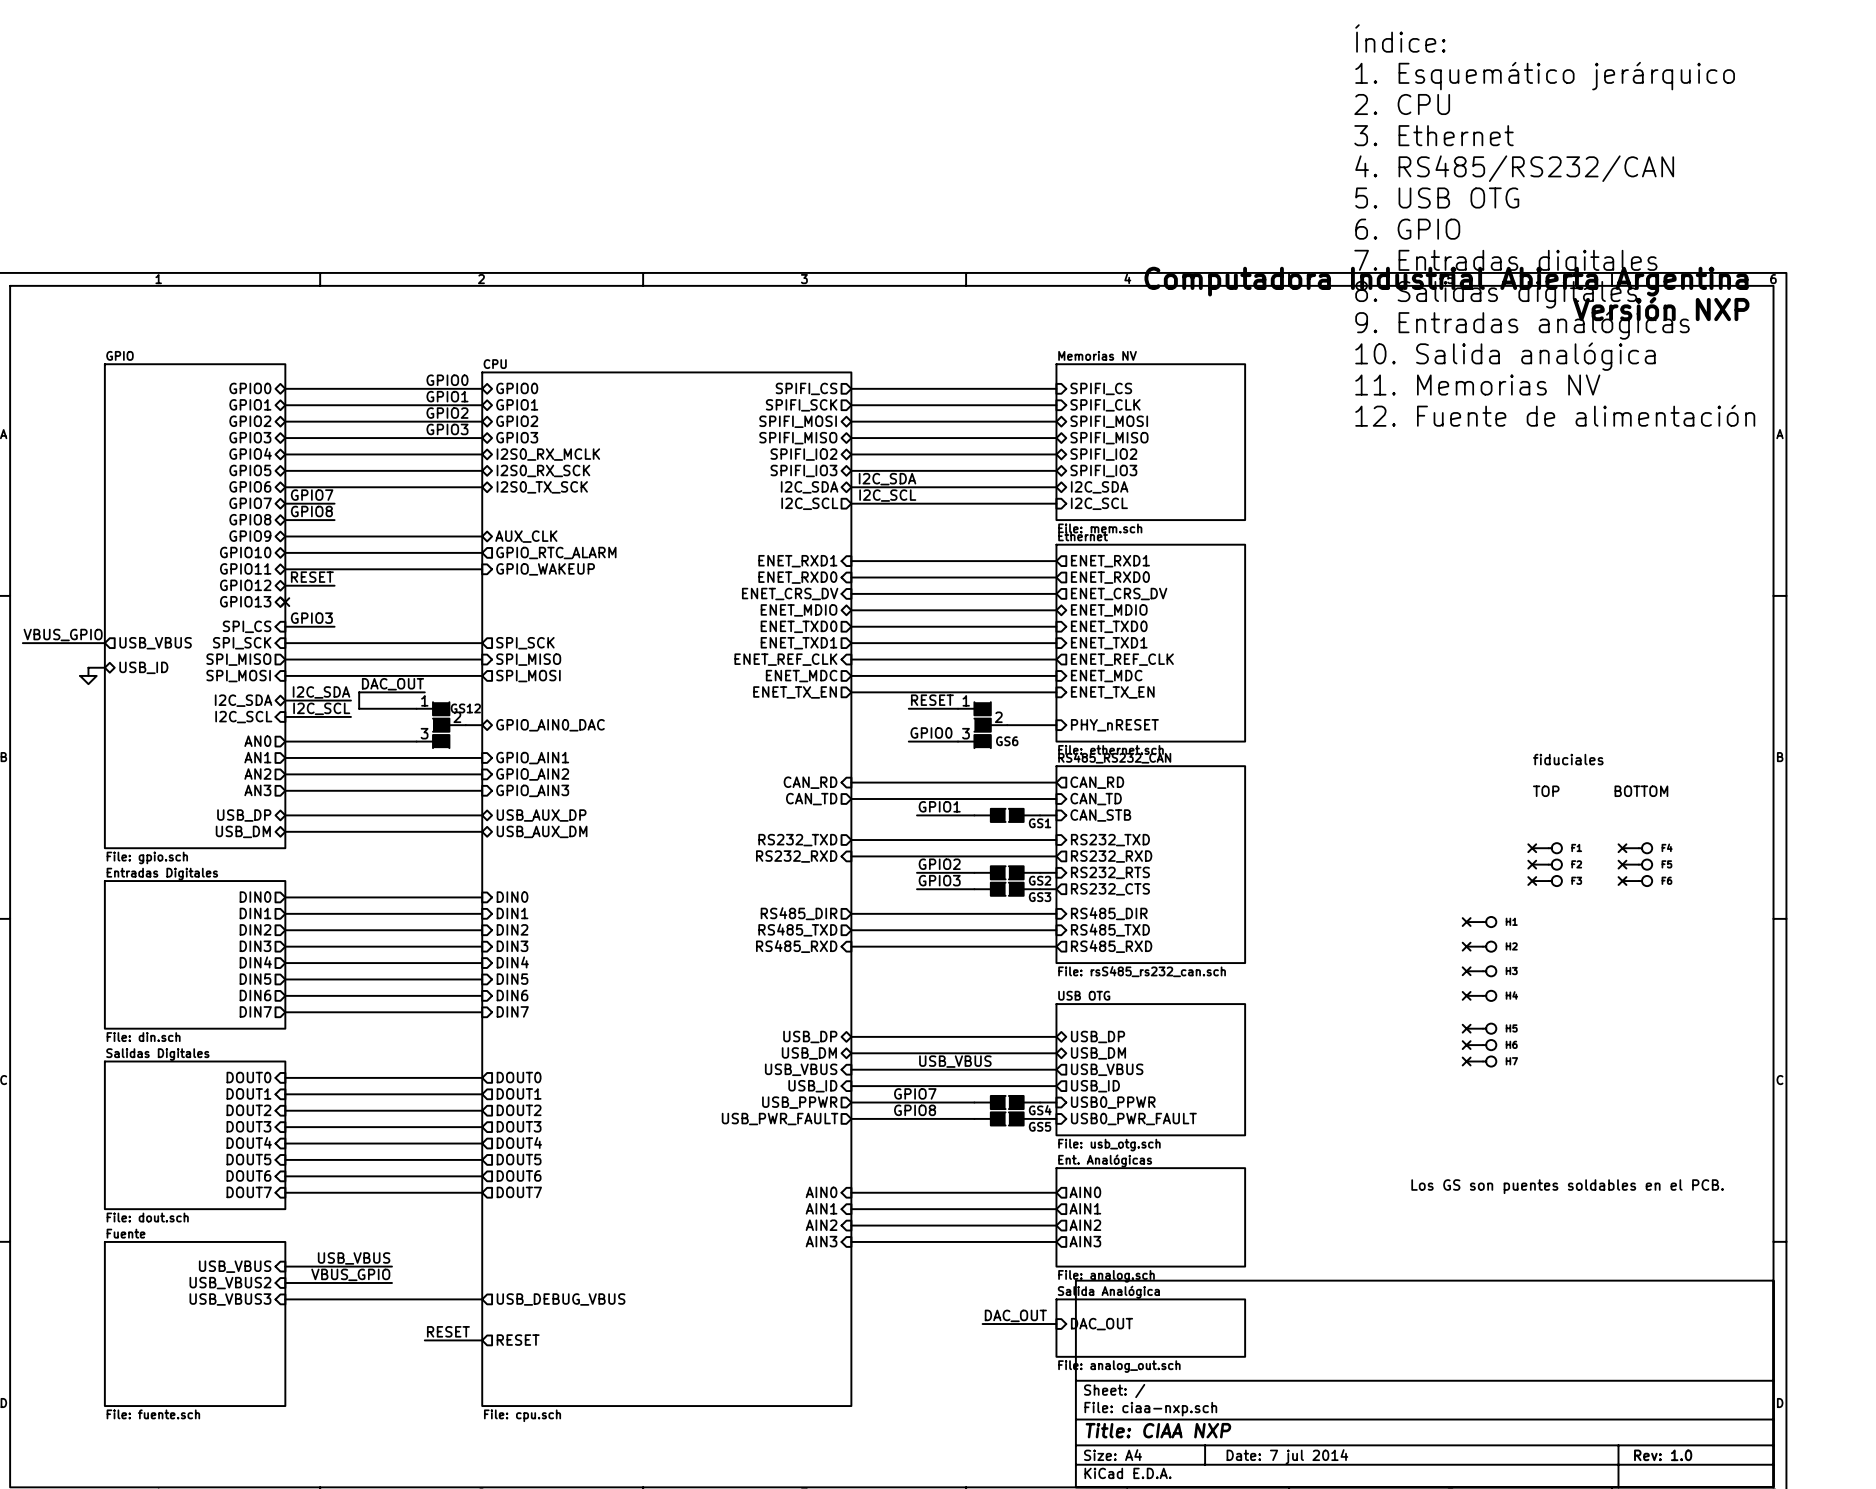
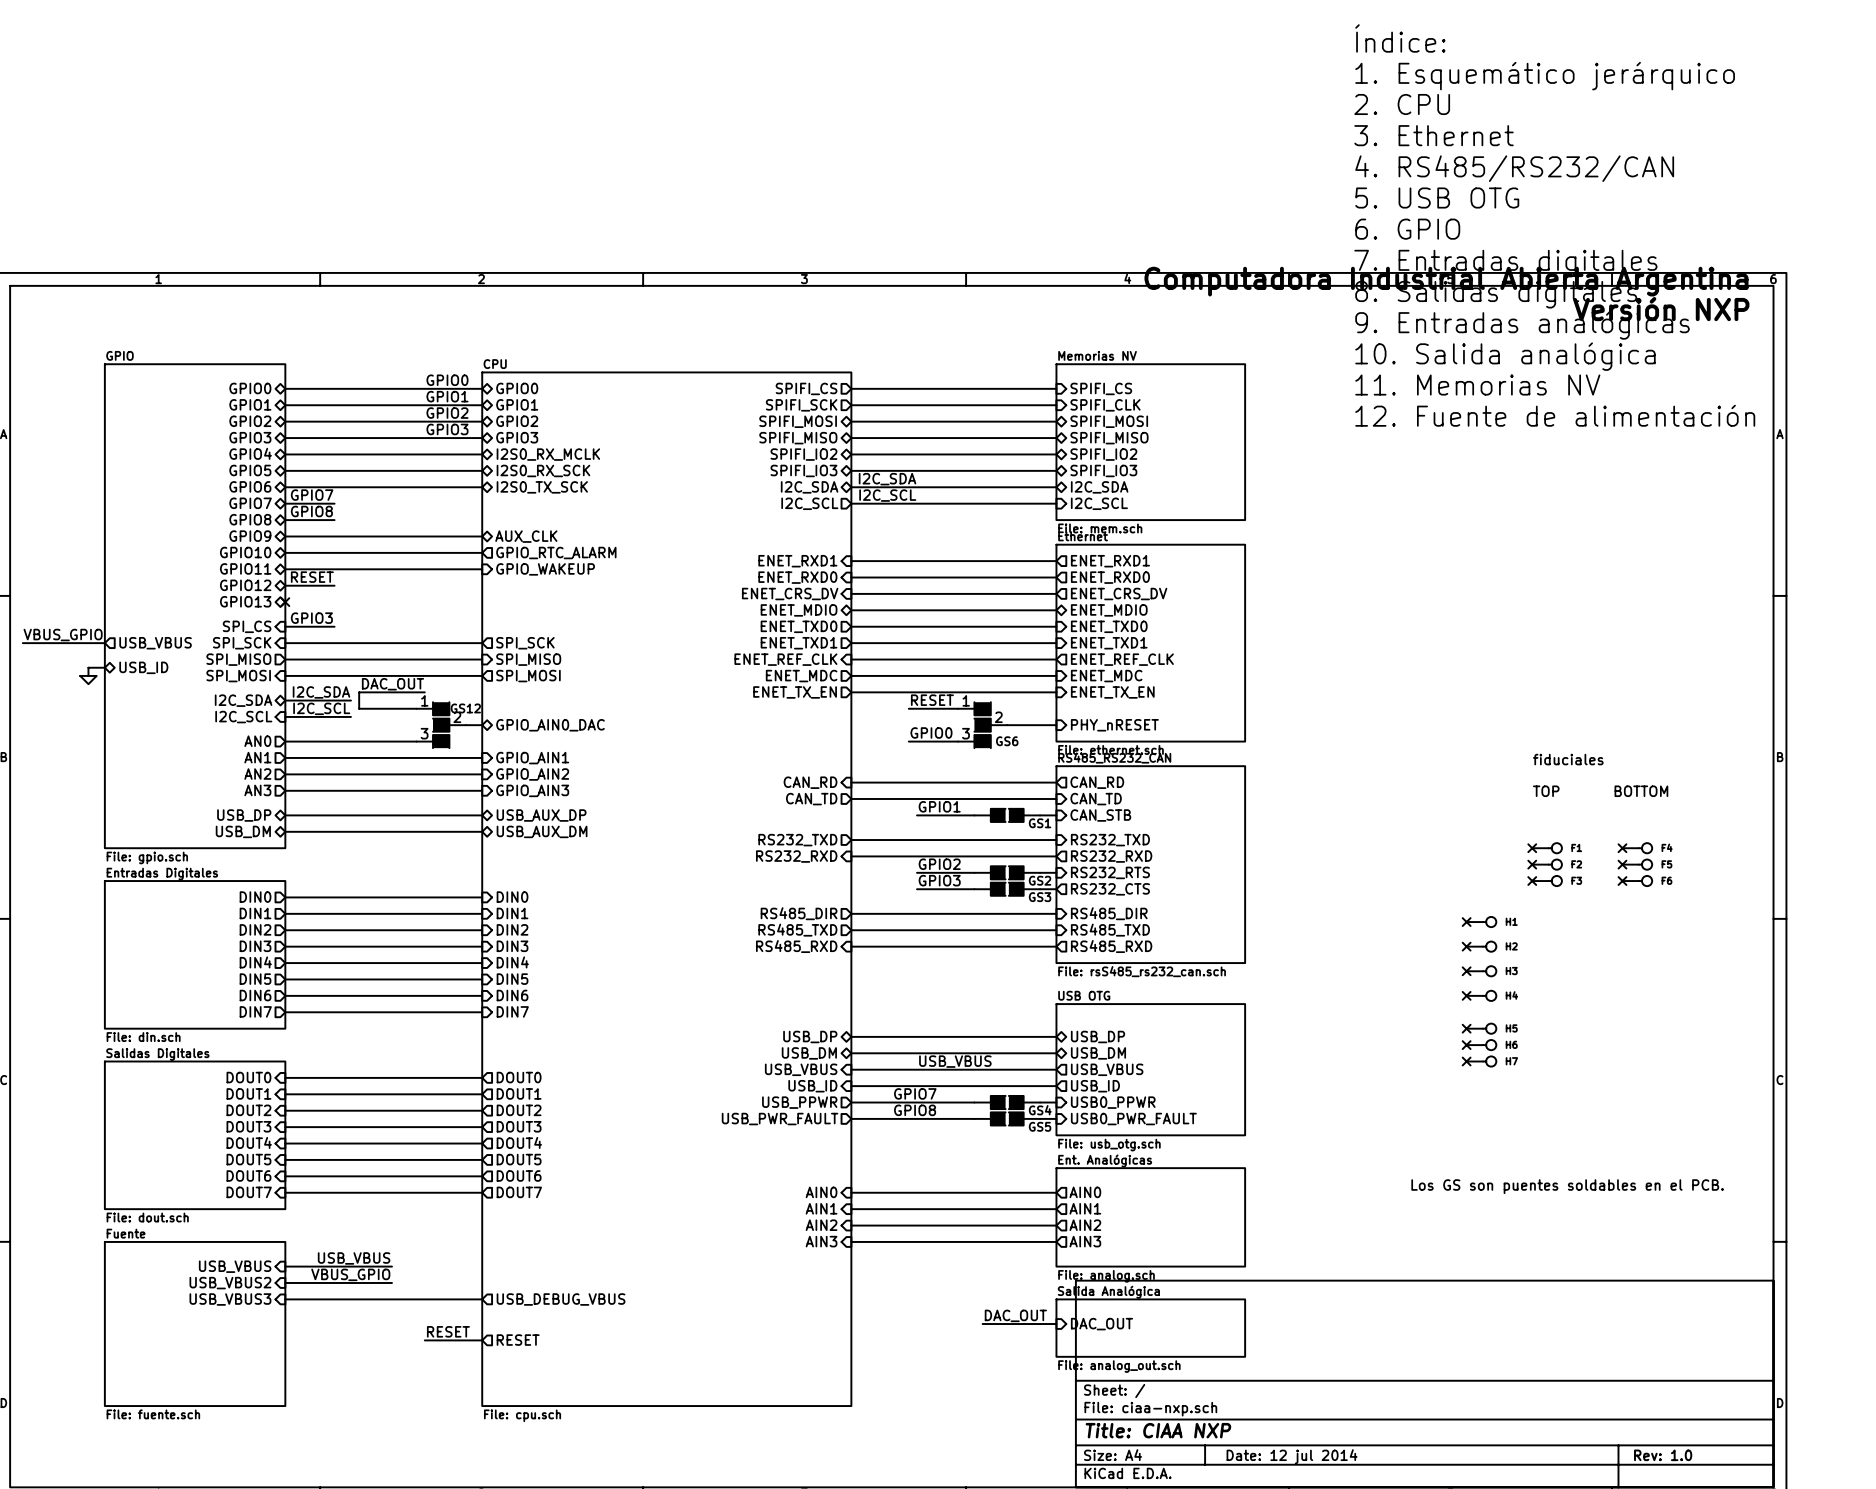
title block: Date: 7 jul 2014 (1287, 1456) -> Date: 12 jul 2014 (1292, 1456)

